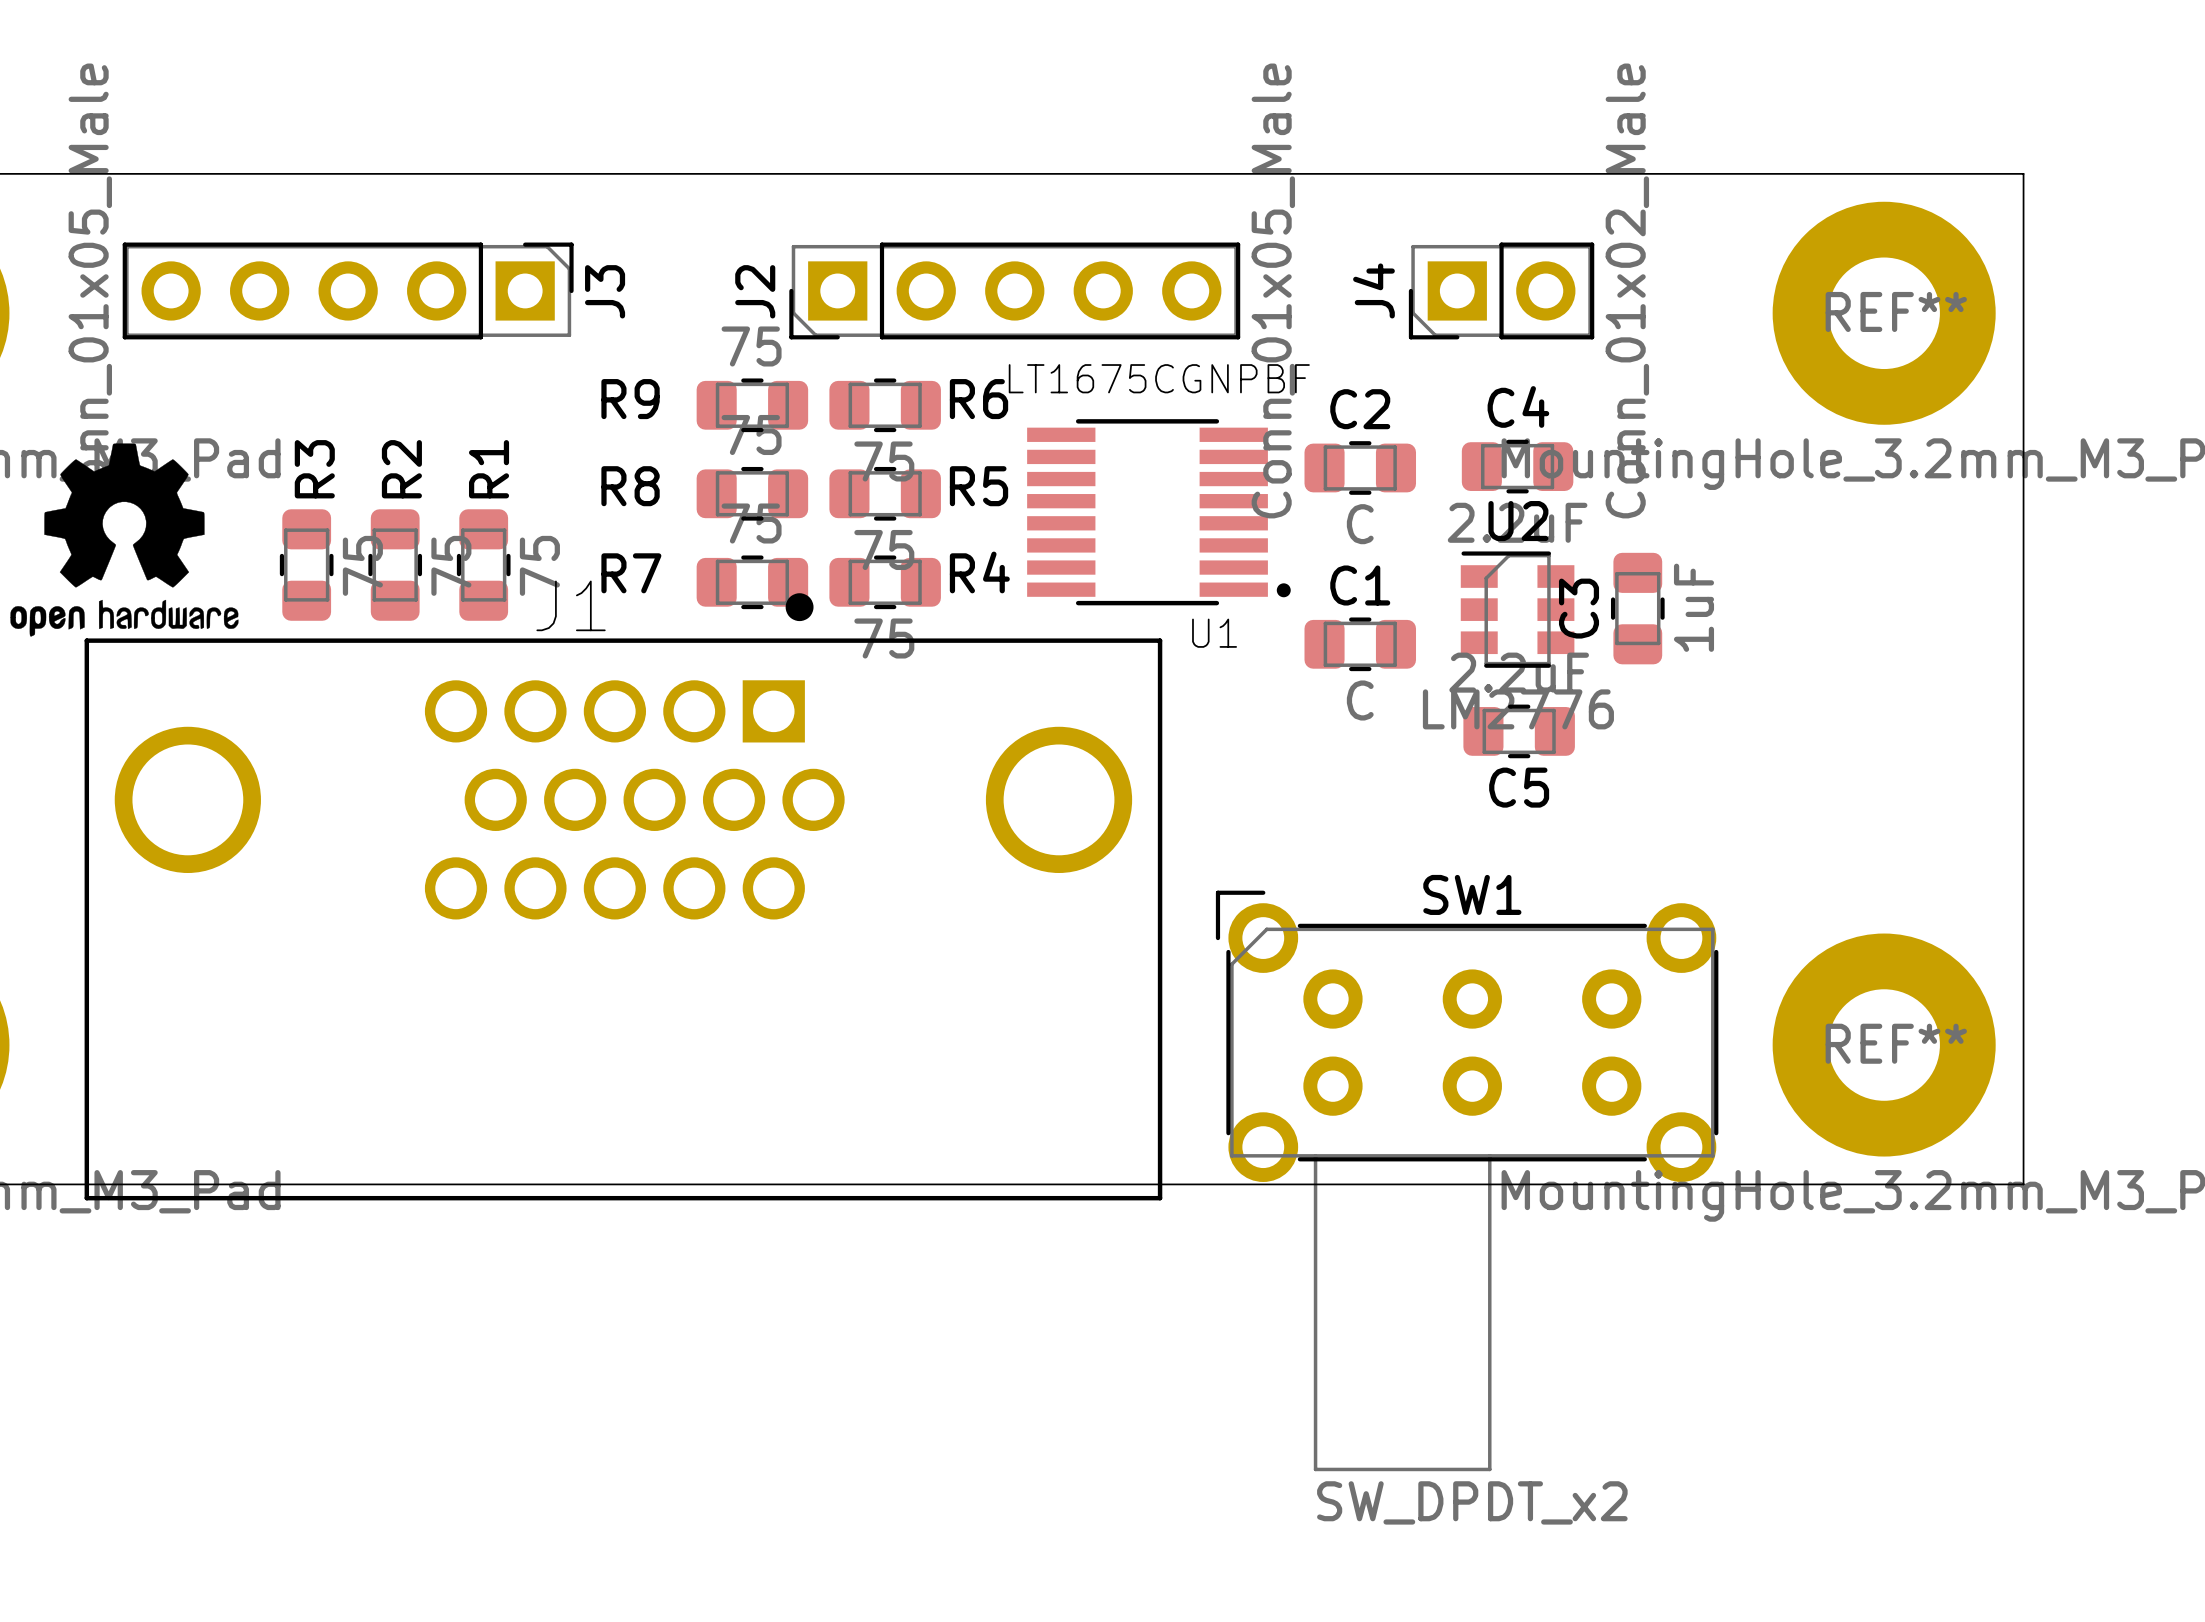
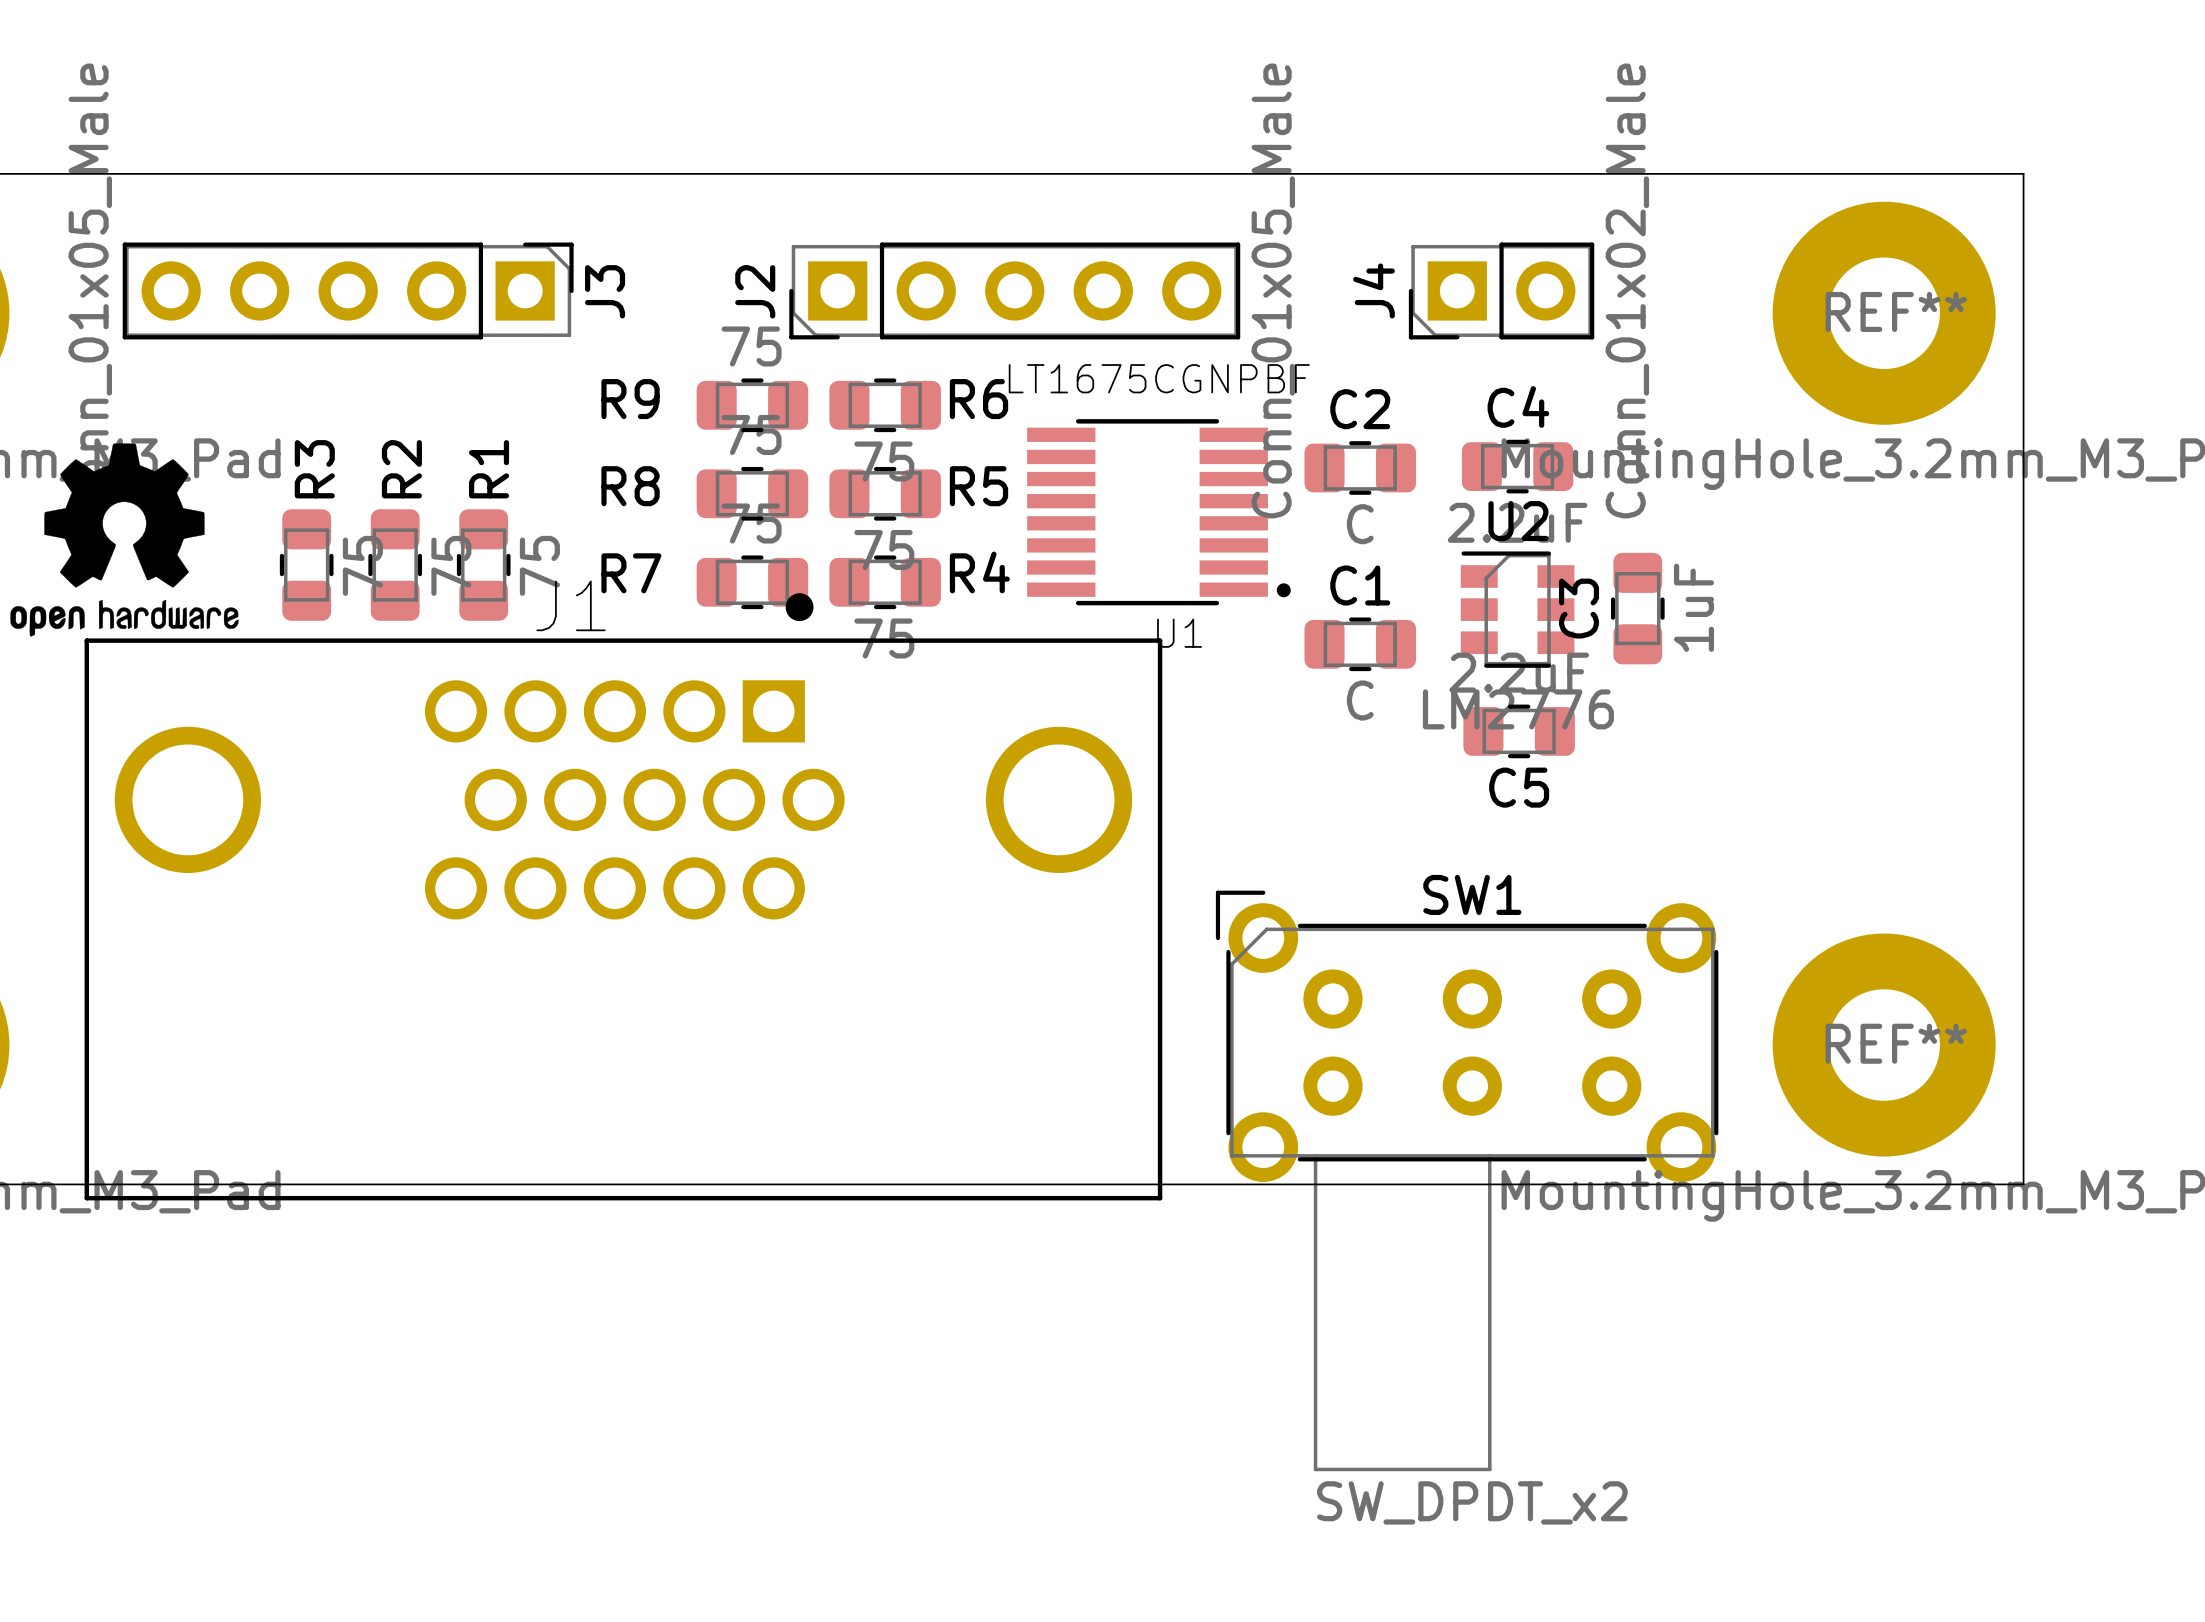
U1 name position: U1 (1214, 633) -> U1 (1179, 633)

